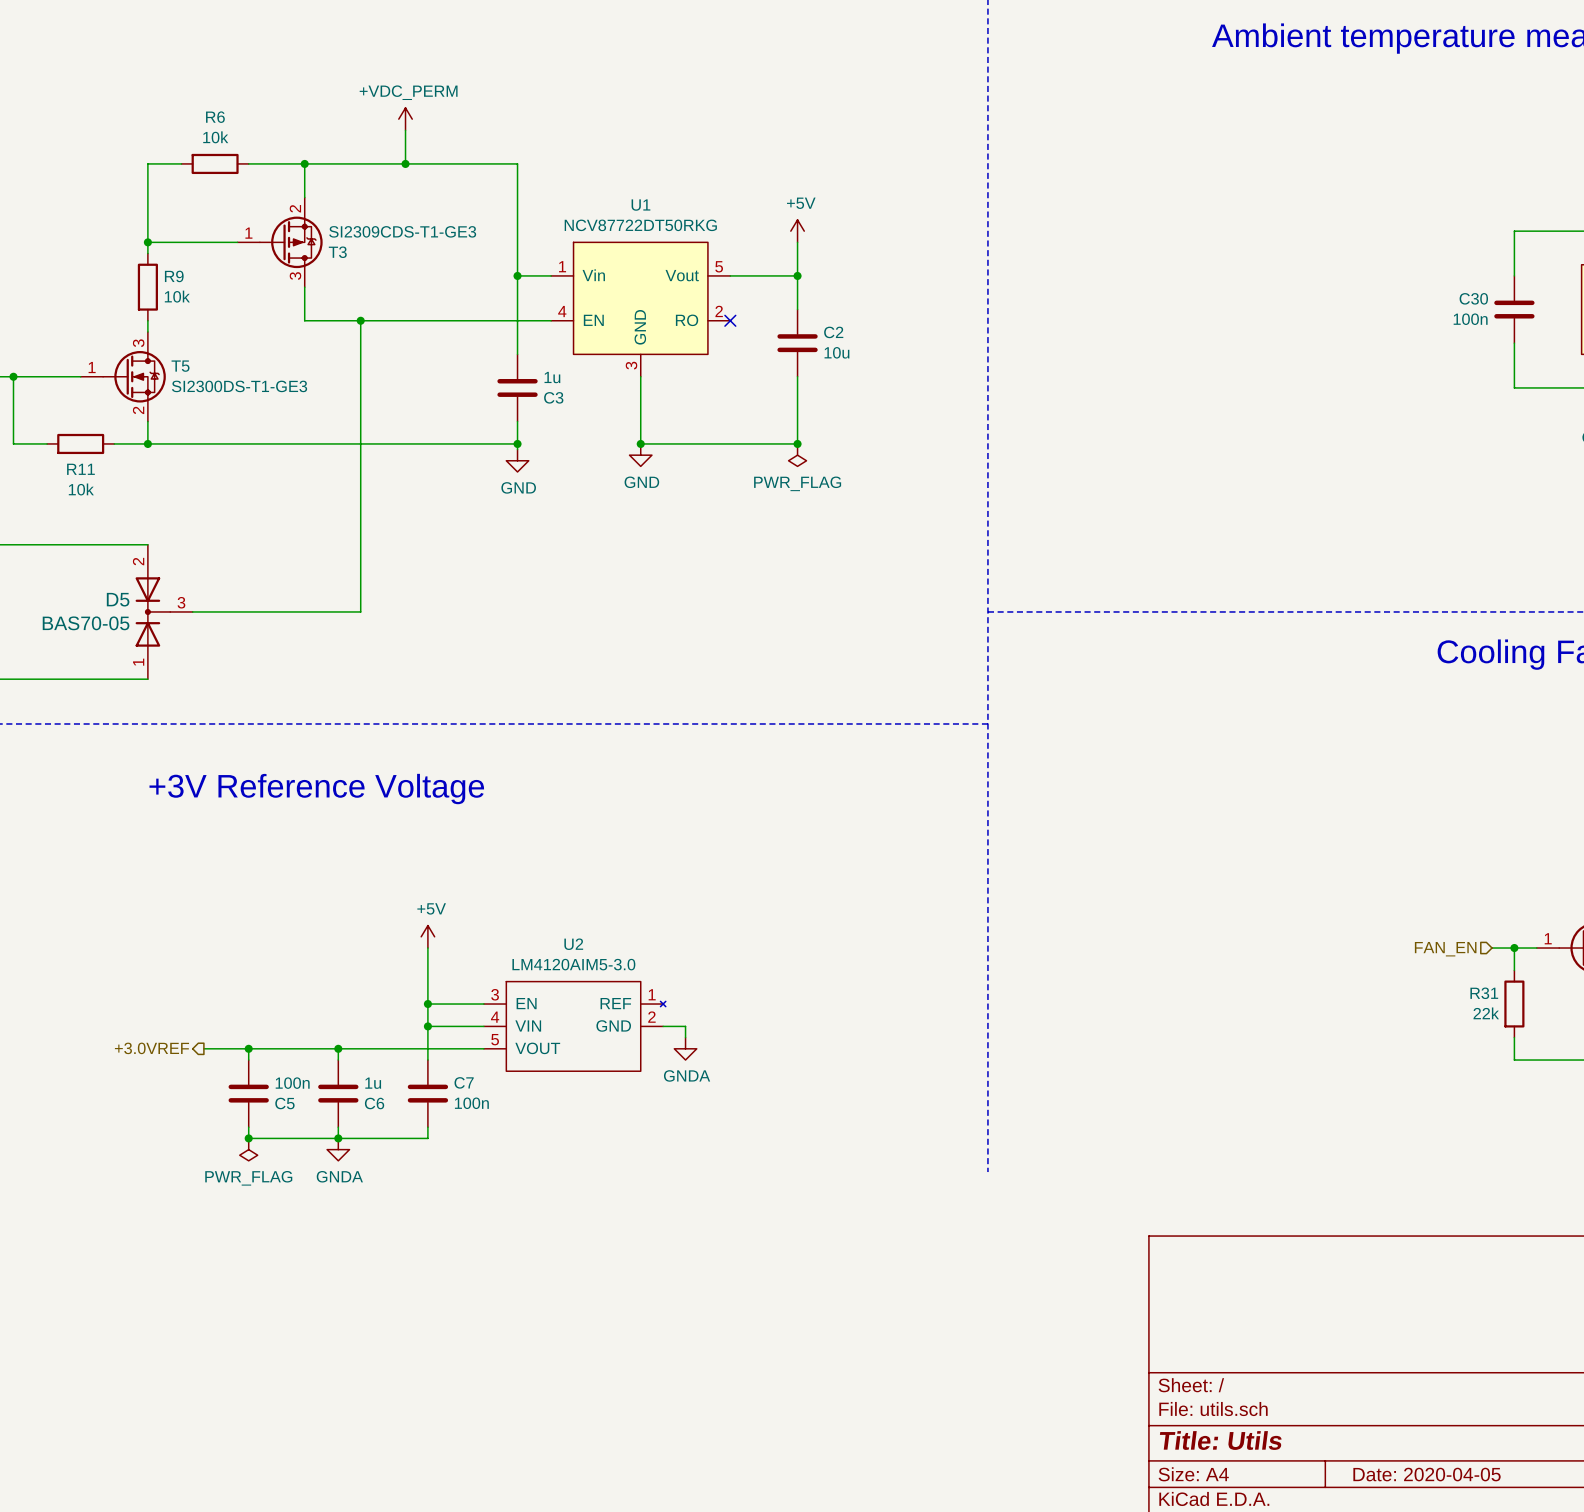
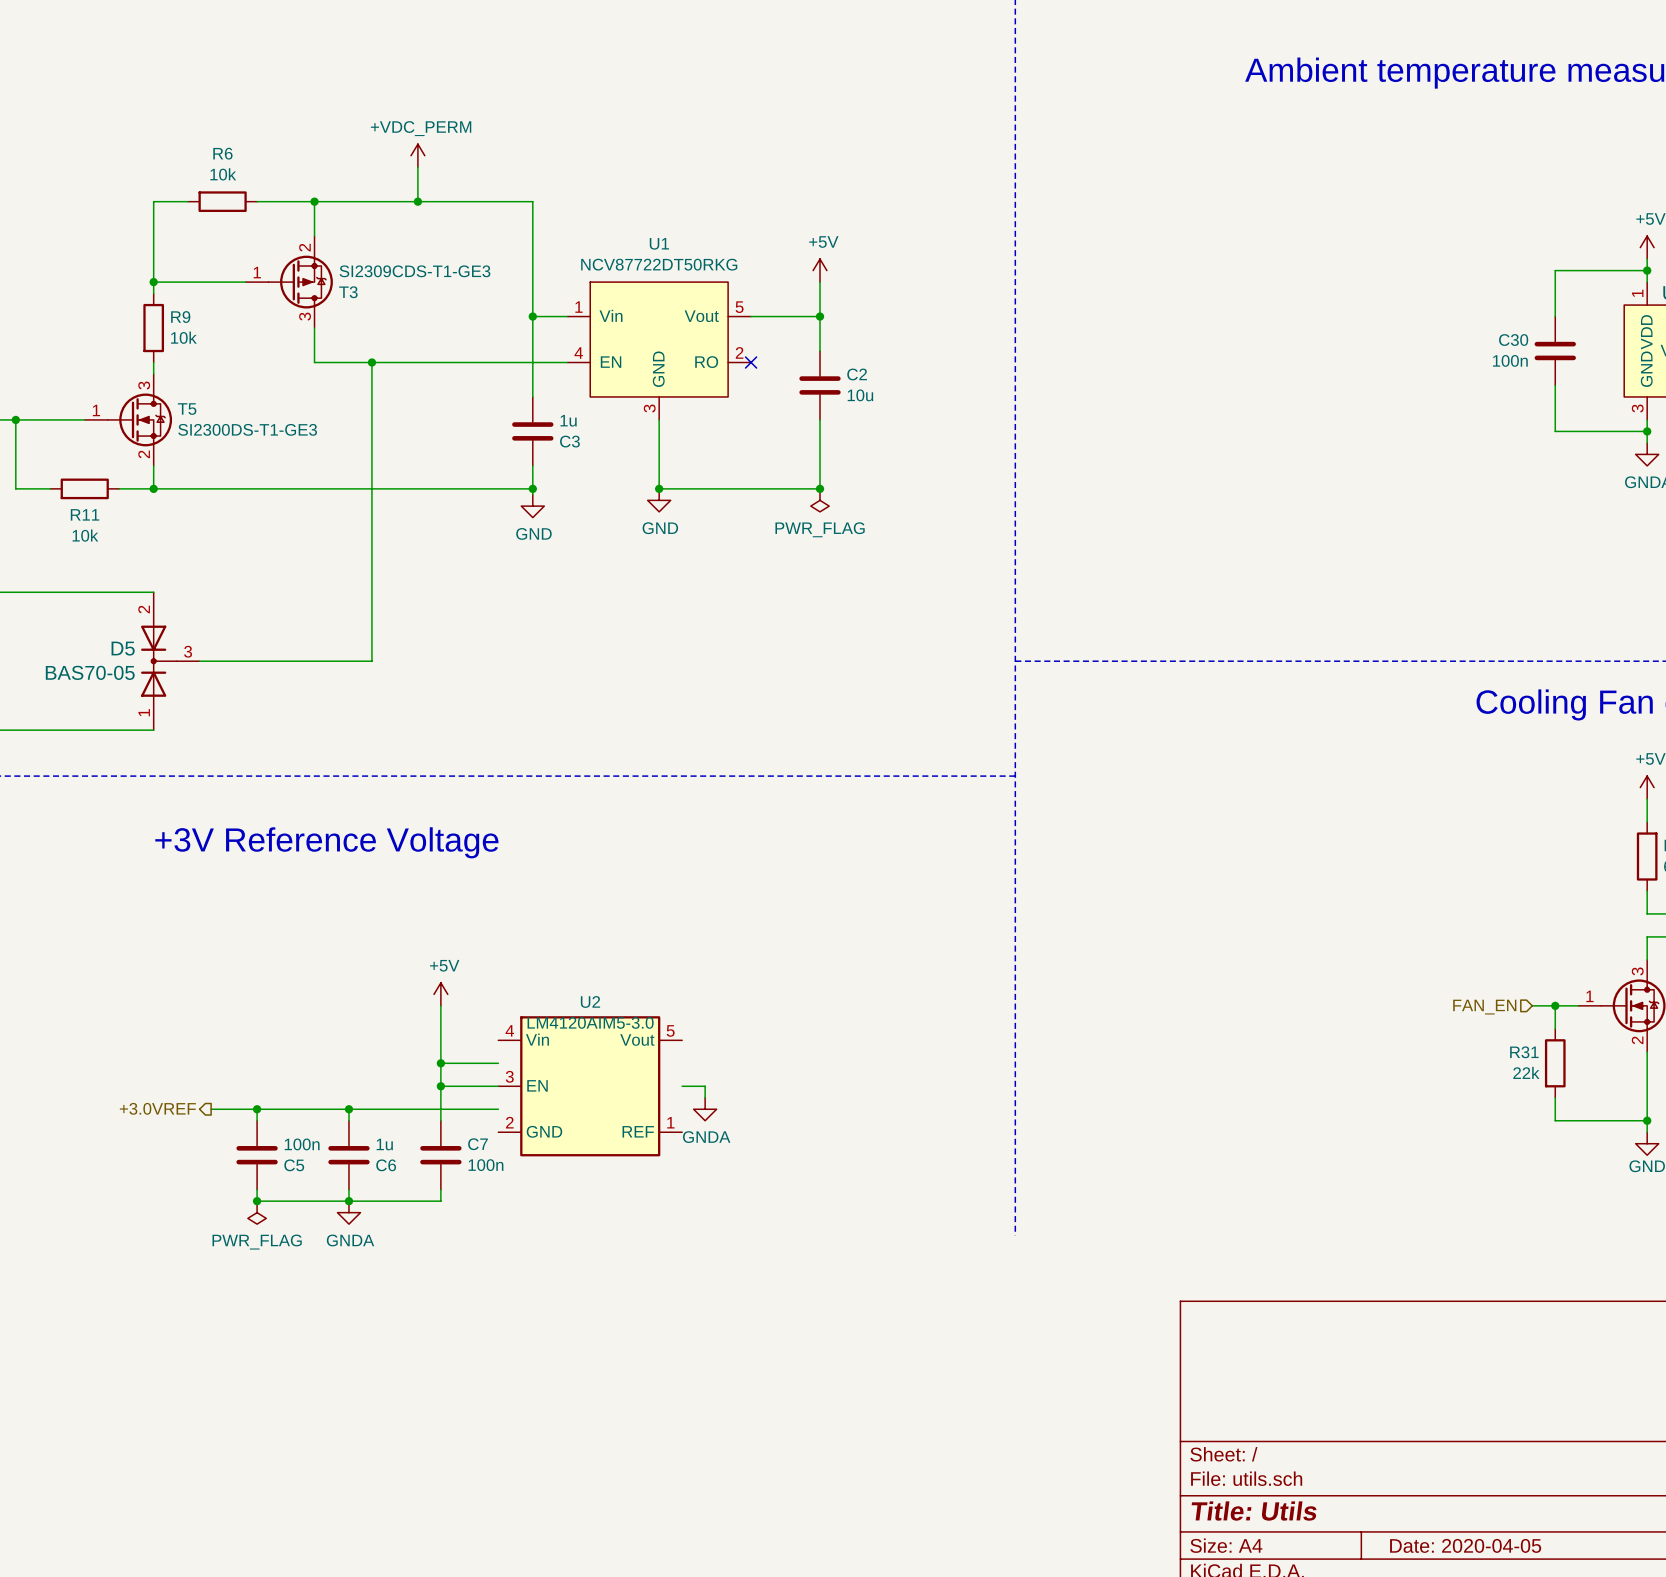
U2 symbol: [483, 981, 666, 1072] -> [498, 1016, 683, 1157]

